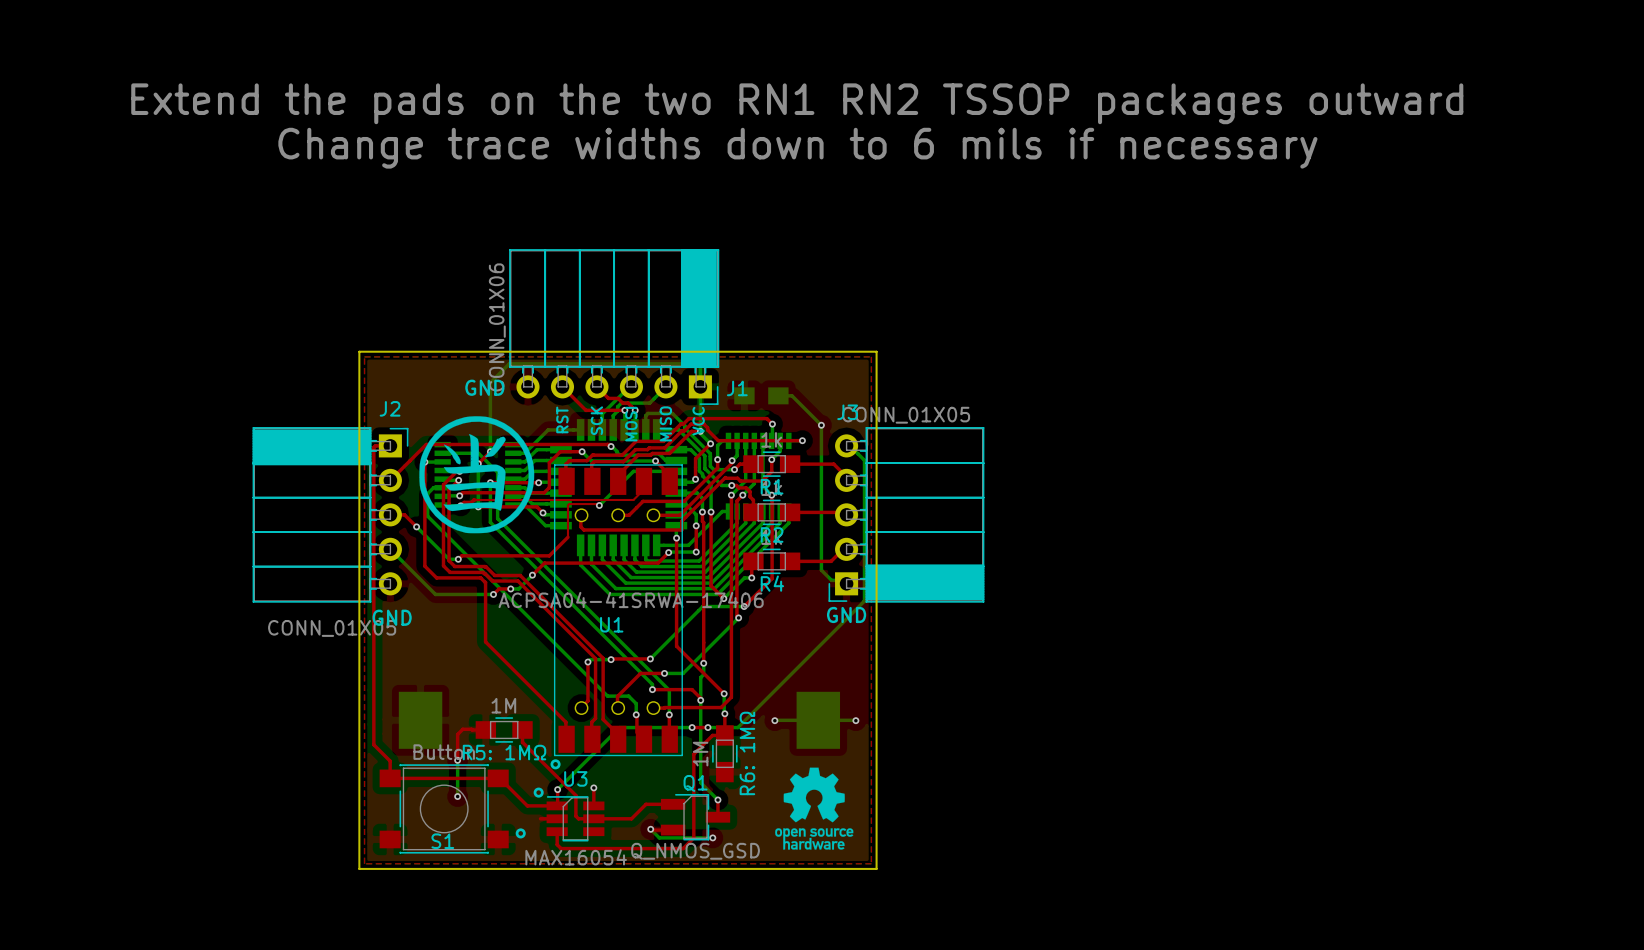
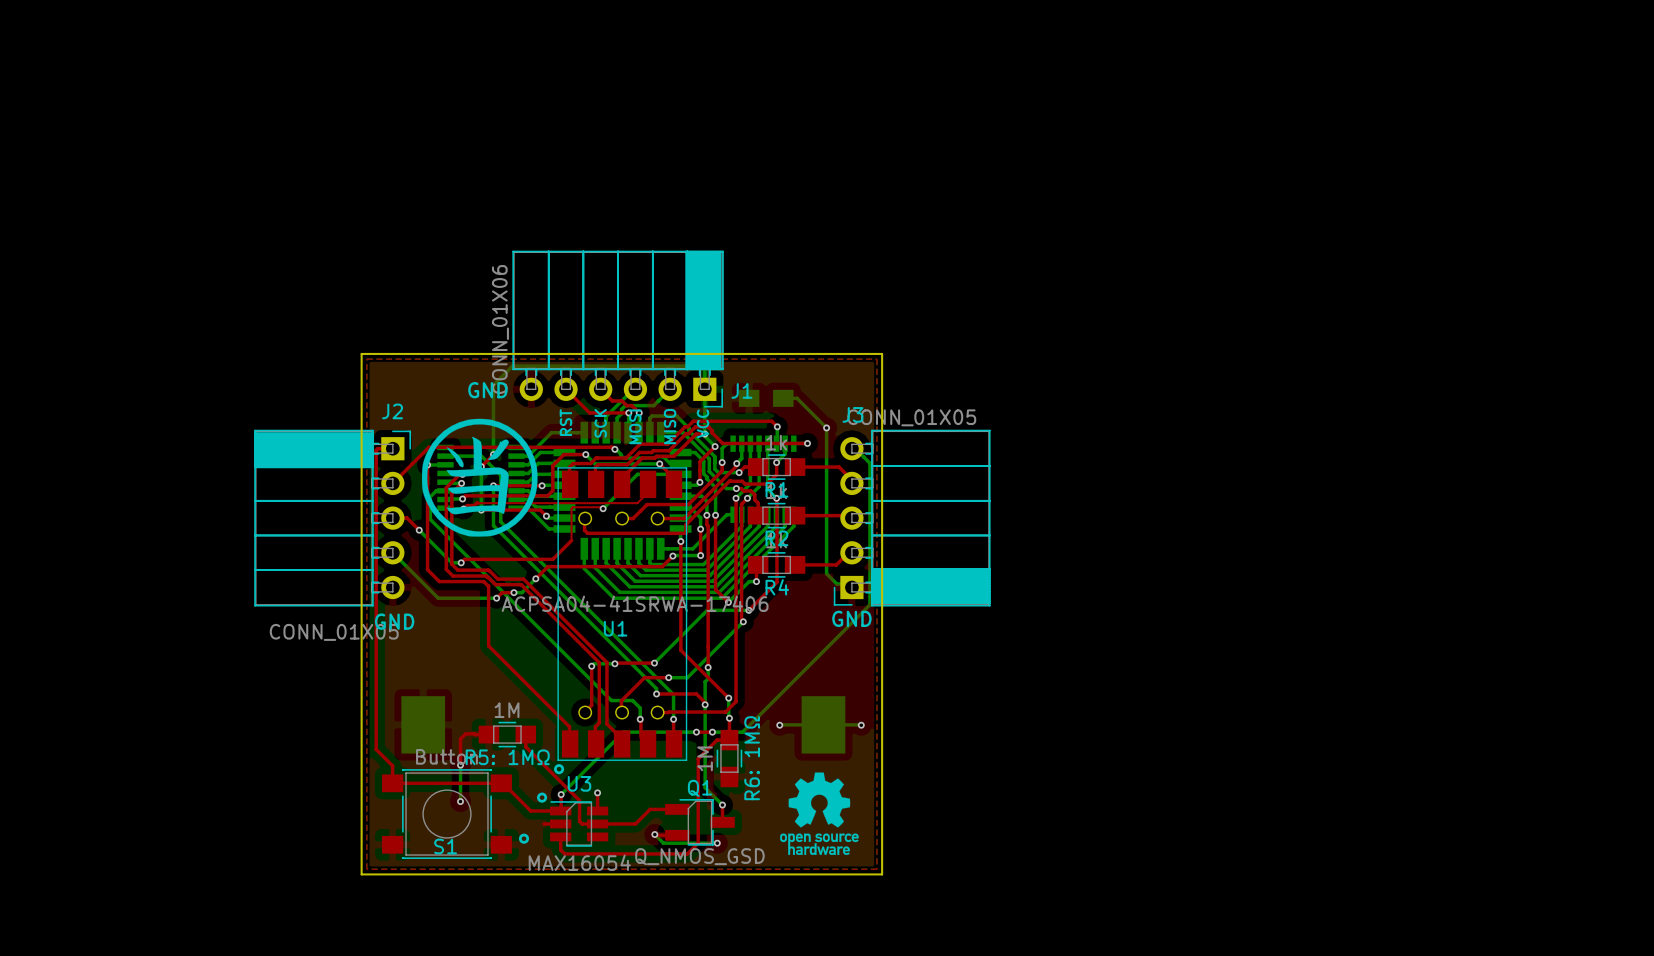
text: Extend the pads on the two RN1 RN2 TSSOP packages outward (797, 103) -> none
text: Change trace widths down to 6 mils if necessary (797, 148) -> none

